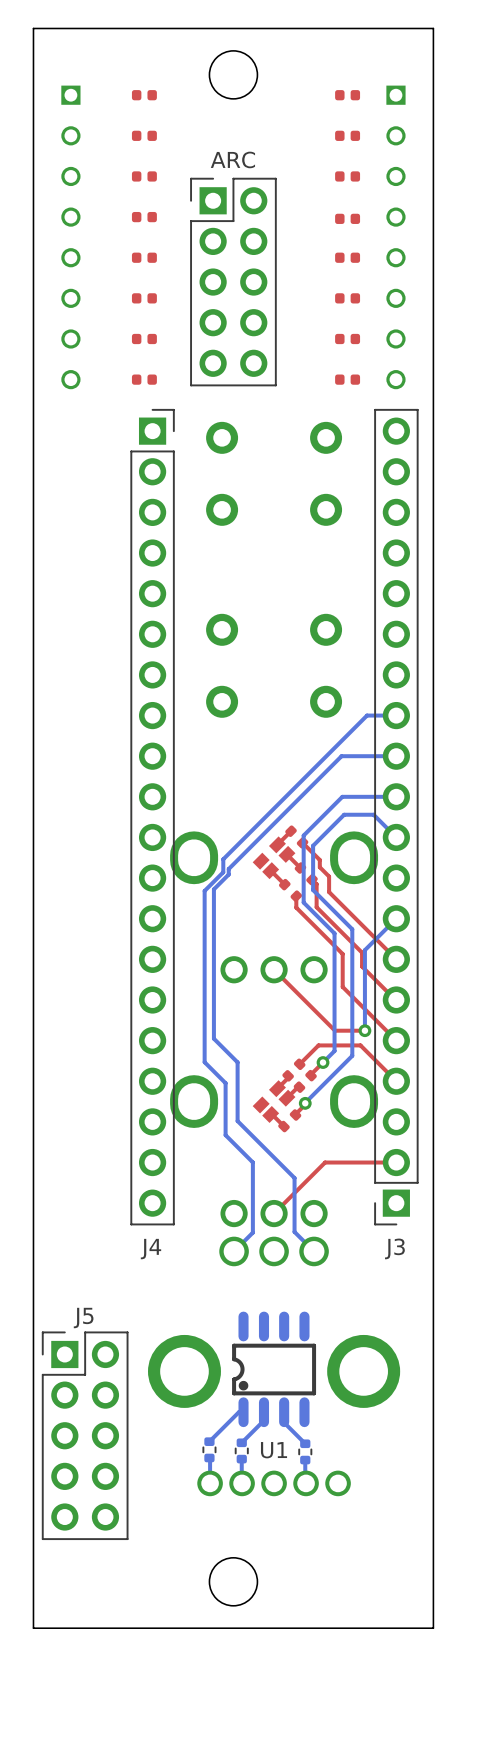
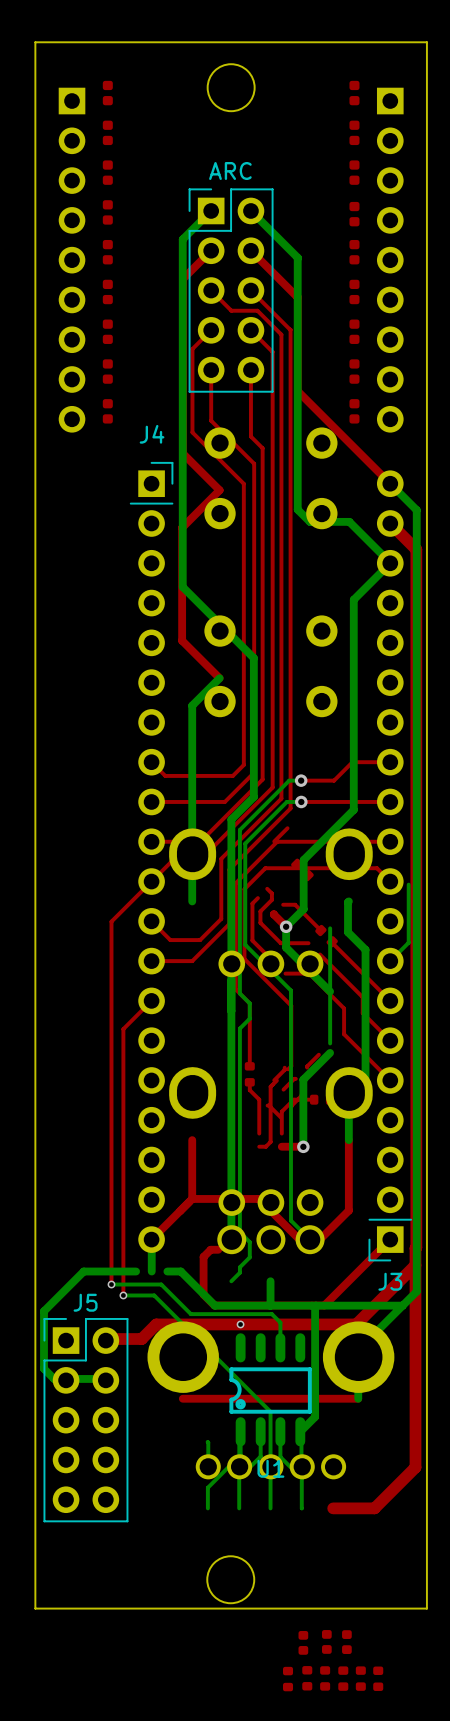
part: none -> (107, 93)
part: none -> (354, 93)
part footprint: [61, 85, 81, 390] -> [58, 87, 86, 433]
part footprint: [386, 85, 406, 390] -> [376, 87, 404, 433]
part: (144, 95) -> none
part: (347, 95) -> none
part: none -> (107, 132)
part: none -> (354, 132)
part: (144, 135) -> none
part: (347, 135) -> none
part: none -> (107, 172)
part: none -> (354, 172)
part: (144, 176) -> none
part: (347, 176) -> none
bottom track: none -> (211, 210) (182, 239) (182, 587) (253, 658) (253, 797) (231, 819) (231, 1249)
bottom track: none -> (250, 210) (297, 257)
part: none -> (107, 212)
part: none -> (354, 214)
part: (144, 217) -> none
part: (347, 218) -> none
top track: none -> (211, 250) (183, 278) (183, 453) (219, 490) (182, 527) (182, 640) (219, 678)
top track: none -> (250, 250) (297, 297) (297, 391) (390, 483)
part: none -> (107, 252)
part: none -> (354, 252)
bottom track: none -> (297, 257) (297, 509) (309, 521) (349, 521) (390, 562) (353, 599) (353, 809) (303, 860) (303, 909) (286, 926) (286, 947) (330, 991)
part: (144, 257) -> none
part: (347, 257) -> none
top track: none -> (211, 290) (231, 310) (257, 310) (281, 334) (281, 798) (221, 858) (221, 918) (200, 940) (170, 940) (151, 921)
top track: none -> (250, 290) (290, 329) (290, 808) (229, 869) (229, 924) (192, 961) (151, 961)
part: none -> (107, 291)
part: none -> (354, 291)
part: (144, 298) -> none
part: (347, 298) -> none
top track: none -> (211, 330) (192, 349) (192, 432) (243, 483) (243, 764) (232, 775) (165, 775) (151, 762)
top track: none -> (250, 330) (272, 351)
part: none -> (107, 331)
part: none -> (354, 331)
part: (144, 338) -> none
part: (347, 338) -> none
top track: none -> (272, 351) (272, 787) (201, 859) (174, 859) (111, 921) (111, 1284)
top track: none -> (211, 370) (211, 420) (254, 463) (254, 772) (224, 801) (151, 801)
top track: none -> (250, 370) (250, 436) (262, 448) (262, 779) (200, 841) (151, 841)
part: none -> (107, 371)
part: none -> (354, 371)
part: (144, 379) -> none
part: (347, 379) -> none
part: none -> (107, 411)
part: none -> (354, 411)
J4 footprint: [130, 408, 175, 1226] -> [129, 461, 174, 1253]
J3 footprint: [374, 408, 419, 1226] -> [368, 470, 413, 1262]
bottom track: none -> (390, 483) (416, 510) (416, 1291) (358, 1350) (358, 1398)
top track: none -> (390, 523) (416, 549) (415, 1467) (374, 1508) (333, 1508)
bottom track: none -> (219, 678) (192, 705) (192, 901)
bottom track: (396, 715) (367, 715) (223, 859) (223, 872) (204, 890) (204, 1062) (225, 1083) (225, 1135) (252, 1162) (252, 1232) (234, 1251) (234, 1248) -> none
bottom track: (396, 756) (341, 756) (228, 869) (228, 874) (213, 889) (213, 1038) (237, 1062) (237, 1121) (294, 1178) -> (301, 801) (286, 801) (245, 843) (245, 944) (290, 990) (290, 1167)
top track: none -> (390, 762) (352, 762) (334, 780) (301, 780)
bottom track: none -> (301, 780) (289, 780) (239, 829) (239, 993) (249, 1003) (249, 1018) (239, 1028) (239, 1232) (249, 1242) (249, 1257) (239, 1267) (239, 1272) (231, 1281)
via: none -> (301, 780)
bottom track: (396, 796) (342, 796) (303, 835) (303, 902) (334, 933) -> none
via: none -> (301, 801)
top track: none -> (390, 801) (301, 801)
part: (296, 836) -> none
bottom track: (396, 837) (373, 814) (344, 814) (313, 845) (313, 890) (352, 929) (352, 1055) (305, 1103) -> none
top track: (302, 842) (319, 860) (319, 867) (329, 876) (329, 892) (396, 959) -> none
top track: none -> (390, 841) (277, 841) (235, 883) (235, 989) (249, 1003) (249, 1066)
top track: (286, 854) (300, 868) -> none
part: (274, 857) -> none
top track: (270, 870) (284, 884) -> none
top track: (312, 879) (316, 884) (316, 907) (362, 952) (362, 966) (396, 999) -> none
top track: none -> (390, 881) (376, 868) (265, 868) (244, 889) (244, 958) (291, 1005) (291, 1066) (288, 1069)
bottom track: none -> (408, 884) (408, 942) (390, 961)
part: (290, 890) -> none
top track: none -> (267, 888) (271, 893) (271, 899) (260, 911) (260, 922) (280, 943) (308, 943)
top track: (296, 896) (296, 907) (342, 954) (342, 986) (396, 1040) -> none
top track: none -> (257, 898) (252, 903) (252, 940) (274, 962)
bottom track: none -> (348, 901) (348, 932) (365, 949) (365, 1091) (348, 1108) (348, 1140)
top track: none -> (283, 904) (295, 904) (320, 930)
top track: none -> (273, 914) (286, 926)
bottom track: (396, 918) (364, 950) (364, 1030) -> none
via: none -> (286, 926)
part: none -> (326, 936)
top track: none -> (332, 942) (390, 1000)
top track: none -> (319, 954) (362, 997) (362, 1013) (390, 1040)
top track: (274, 969) (335, 1030) (364, 1030) -> none
top track: none -> (285, 973) (309, 973) (344, 1008) (344, 1034) (390, 1080)
top track: none -> (151, 1000) (123, 1029) (123, 1295)
via: (364, 1030) -> none
bottom track: (334, 1051) (323, 1062) -> none
bottom track: none -> (330, 1052) (303, 1079) (303, 1146)
via: (323, 1062) -> none
top track: (299, 1064) (318, 1045) (360, 1045) (396, 1081) -> none
part: (293, 1070) -> none
part: (305, 1081) -> none
part: none -> (249, 1074)
top track: none -> (276, 1080) (270, 1086) (270, 1141) (265, 1146) (259, 1146)
top track: none -> (249, 1082) (249, 1090) (259, 1099) (259, 1133)
part: (274, 1101) -> none
via: (305, 1103) -> none
top track: none -> (314, 1099) (293, 1099) (281, 1111) (281, 1133)
part: none -> (322, 1099)
part: (289, 1120) -> none
top track: none -> (192, 1140) (192, 1198)
top track: none -> (348, 1140) (348, 1210) (309, 1249) (258, 1198) (192, 1198)
top track: none -> (303, 1146) (281, 1146)
via: none -> (303, 1146)
top track: (396, 1162) (325, 1162) (274, 1213) -> none
top track: none -> (192, 1198) (151, 1239)
J4 name position: J4 (150, 1249) -> J4 (152, 434)
bottom track: none -> (151, 1239) (151, 1271)
top track: none -> (390, 1239) (324, 1305) (214, 1305) (203, 1294) (203, 1256) (210, 1249) (218, 1249)
top track: none -> (415, 1265) (356, 1324) (156, 1324) (141, 1339) (111, 1339)
bottom track: none -> (136, 1271) (83, 1271) (43, 1311) (43, 1368) (54, 1378) (111, 1378)
bottom track: none -> (167, 1271) (180, 1271) (215, 1305) (402, 1305)
bottom track: none -> (270, 1281) (270, 1305)
bottom track: none -> (111, 1284) (161, 1284) (190, 1314) (271, 1314) (280, 1322) (280, 1347)
via: none -> (111, 1284)
bottom track: none -> (123, 1295) (154, 1295) (270, 1411) (270, 1508)
via: none -> (123, 1295)
U1 footprint: [232, 1311, 317, 1428] -> [229, 1333, 312, 1447]
bottom track: none -> (315, 1305) (315, 1416) (300, 1431)
via: none -> (240, 1324)
bottom track: (243, 1412) (238, 1412) (209, 1441) -> none
bottom track: (263, 1412) (263, 1420) (241, 1442) -> none
bottom track: (284, 1412) (284, 1422) (305, 1443) -> none
top track: none -> (358, 1398) (182, 1398)
bottom track: none -> (240, 1431) (240, 1455) (207, 1487) (207, 1508)
bottom track: none -> (260, 1431) (260, 1456) (239, 1478) (239, 1508)
bottom track: none -> (280, 1431) (280, 1457) (301, 1478) (301, 1508)
part: (209, 1449) -> none
part: (241, 1450) -> none
part: (305, 1451) -> none
round board edge position: (233, 1581) -> (230, 1579)
part: none -> (326, 1641)
part: none -> (346, 1642)
part: none -> (303, 1642)
part: none -> (307, 1678)
part: none -> (325, 1678)
part: none -> (343, 1678)
part: none -> (360, 1678)
part: none -> (378, 1678)
part: none -> (288, 1679)

